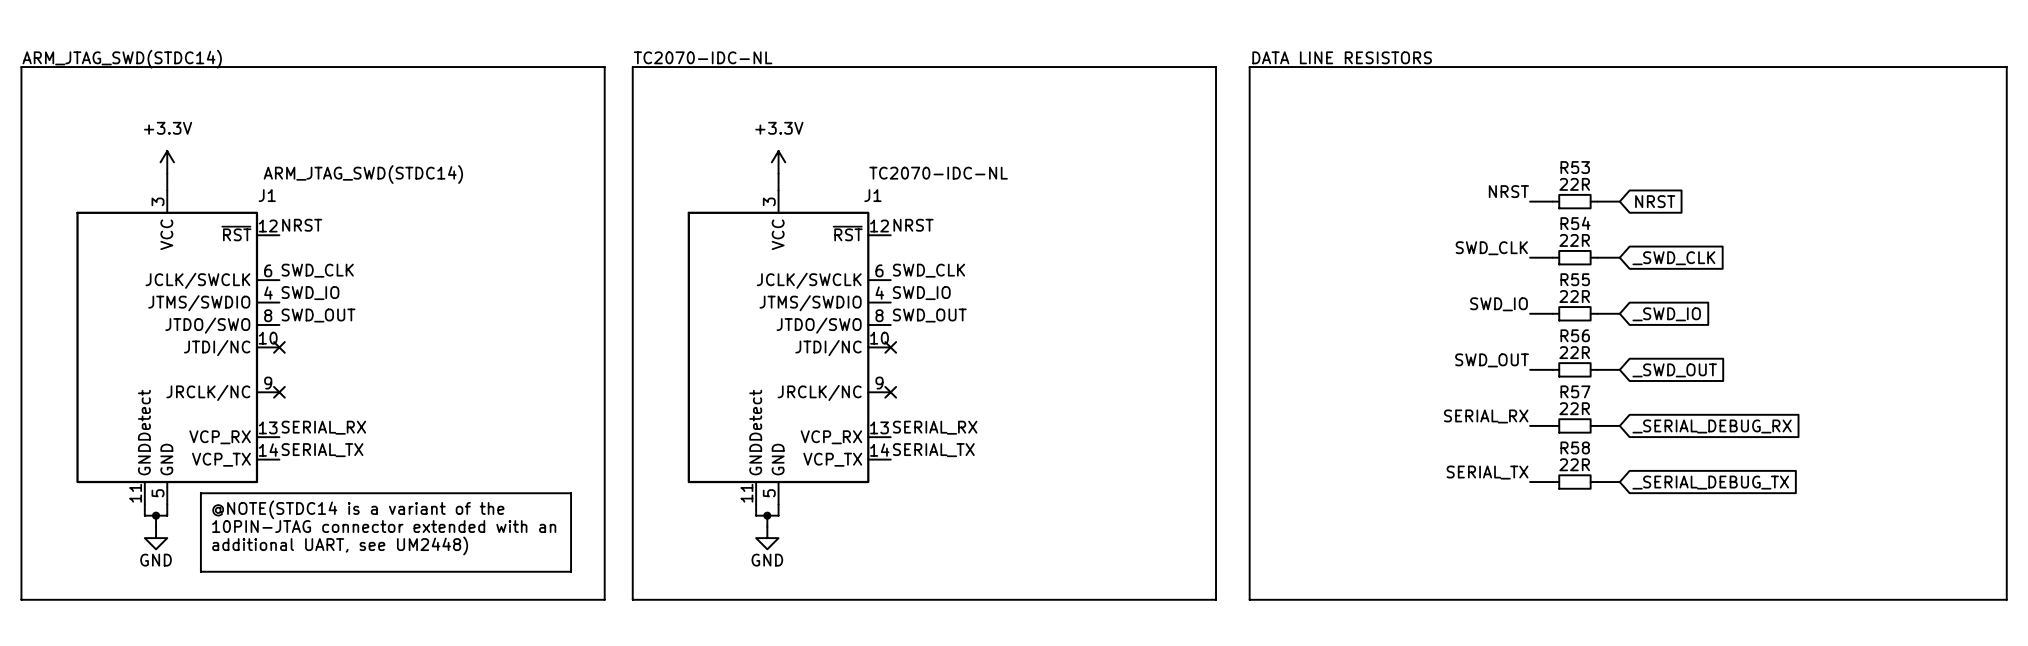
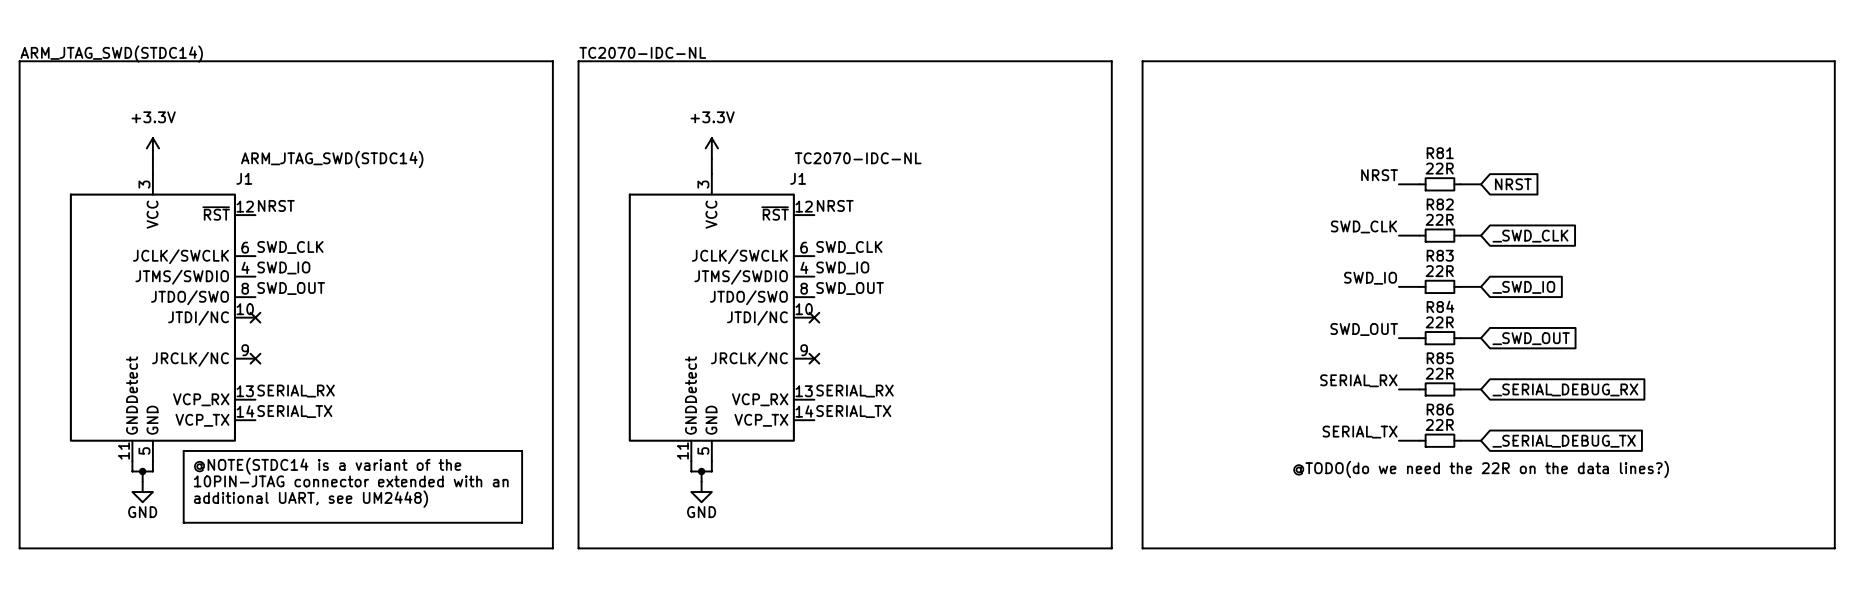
text: DATA LINE RESISTORS (1342, 57) -> none
R53 name: R53 (1575, 167) -> R81 (1440, 153)
R54 name: R54 (1575, 223) -> R82 (1440, 204)
R55 name: R55 (1575, 279) -> R83 (1440, 255)
R56 name: R56 (1575, 335) -> R84 (1440, 306)
R57 name: R57 (1575, 391) -> R85 (1440, 358)
R58 name: R58 (1575, 447) -> R86 (1440, 409)
text: none -> @TODO(do we need the 22R on the data lines?) (1481, 469)

